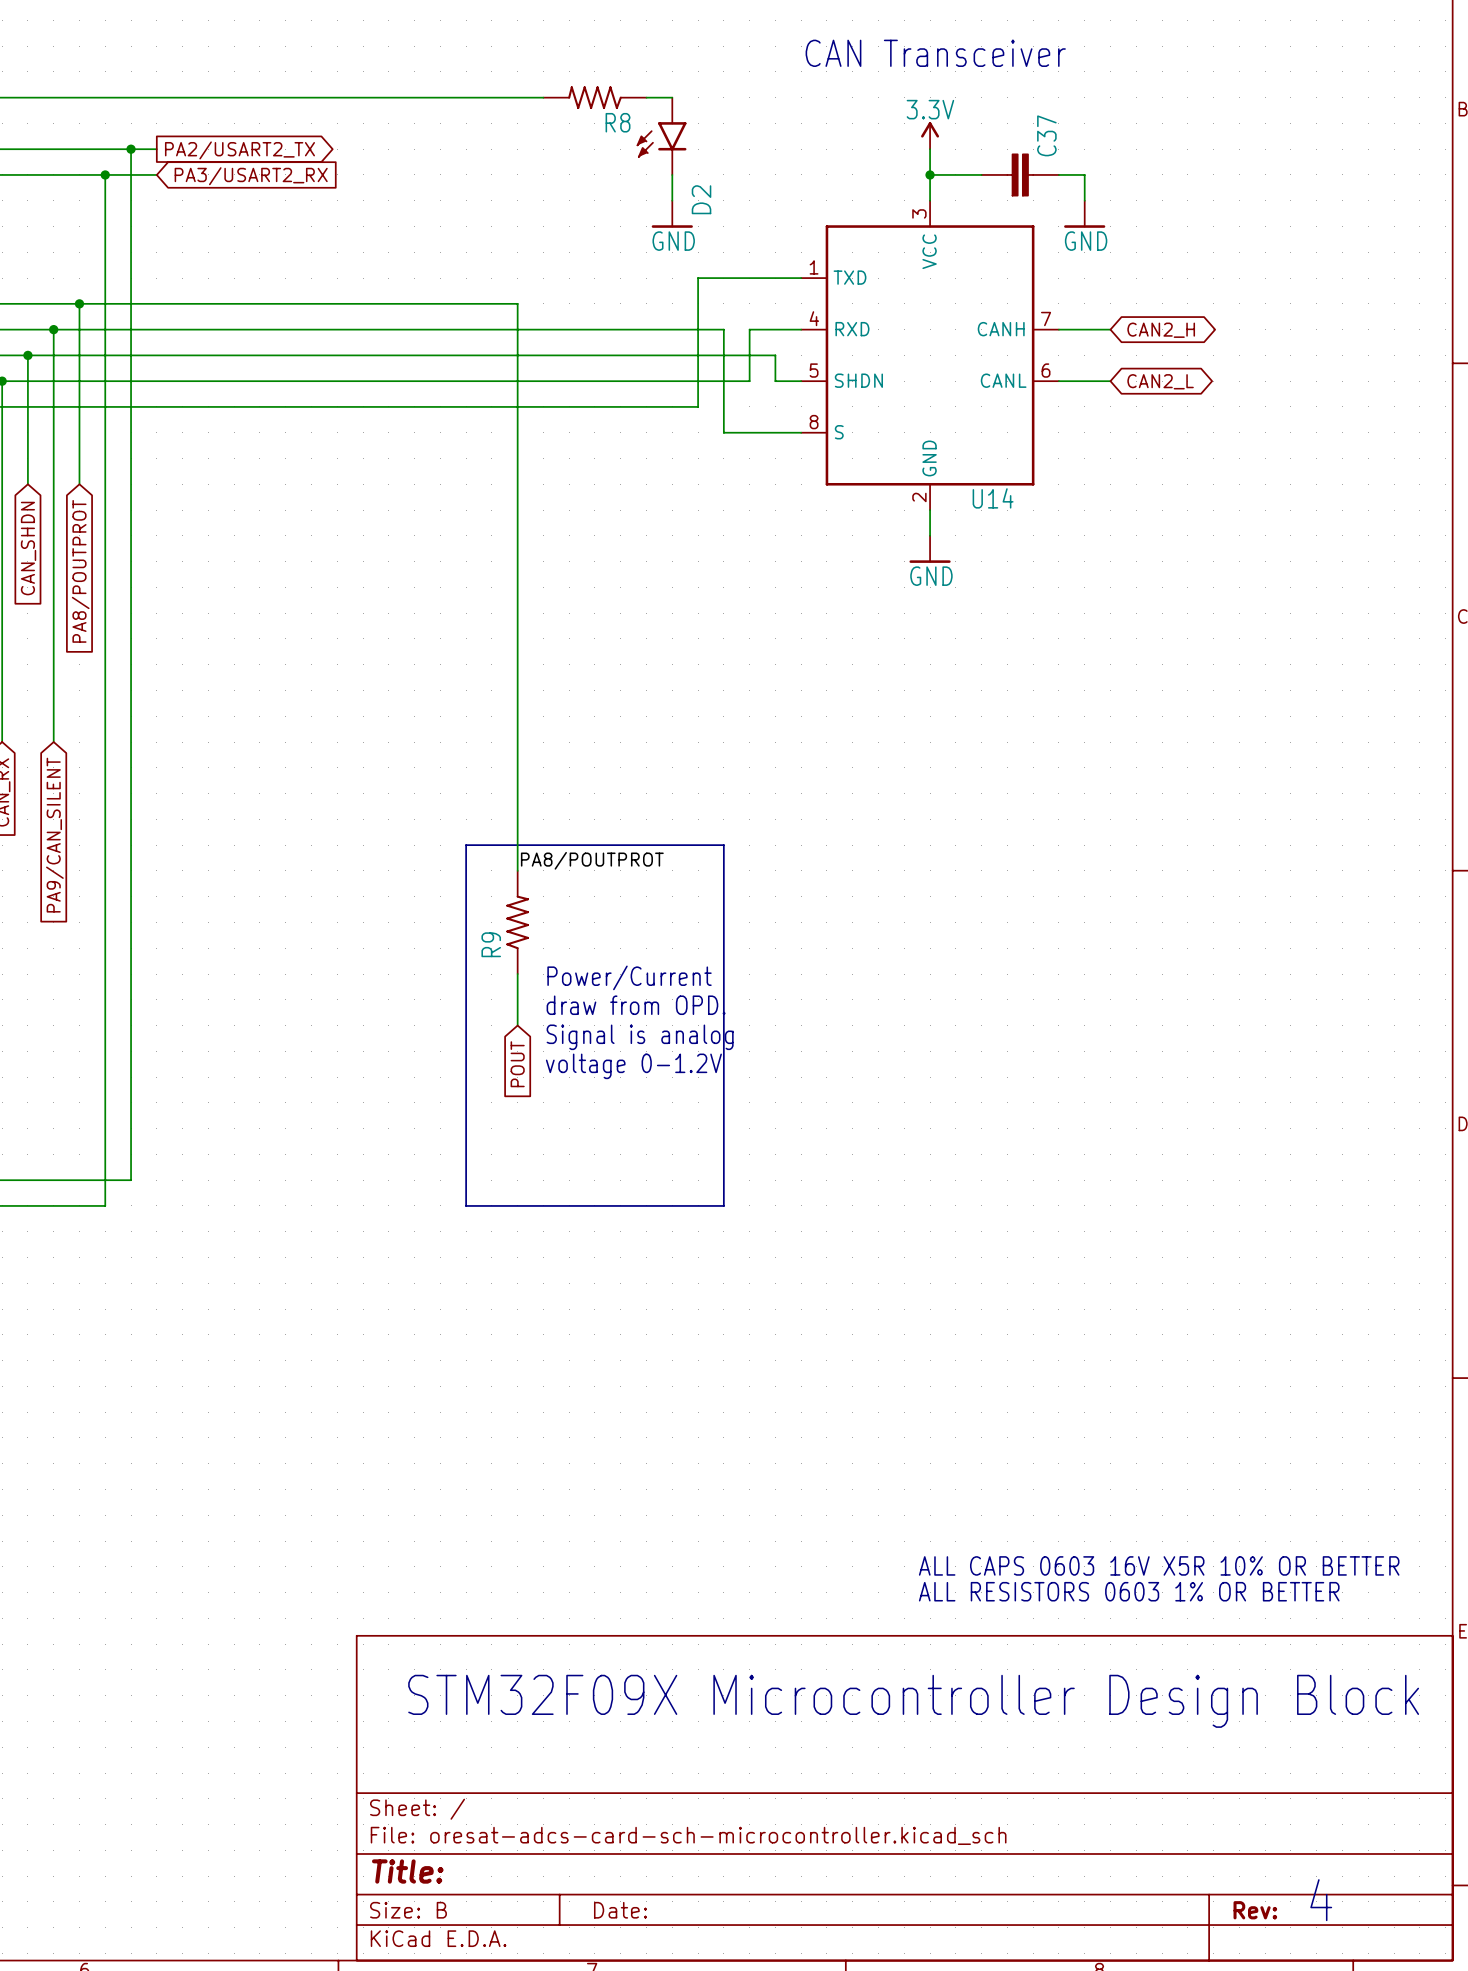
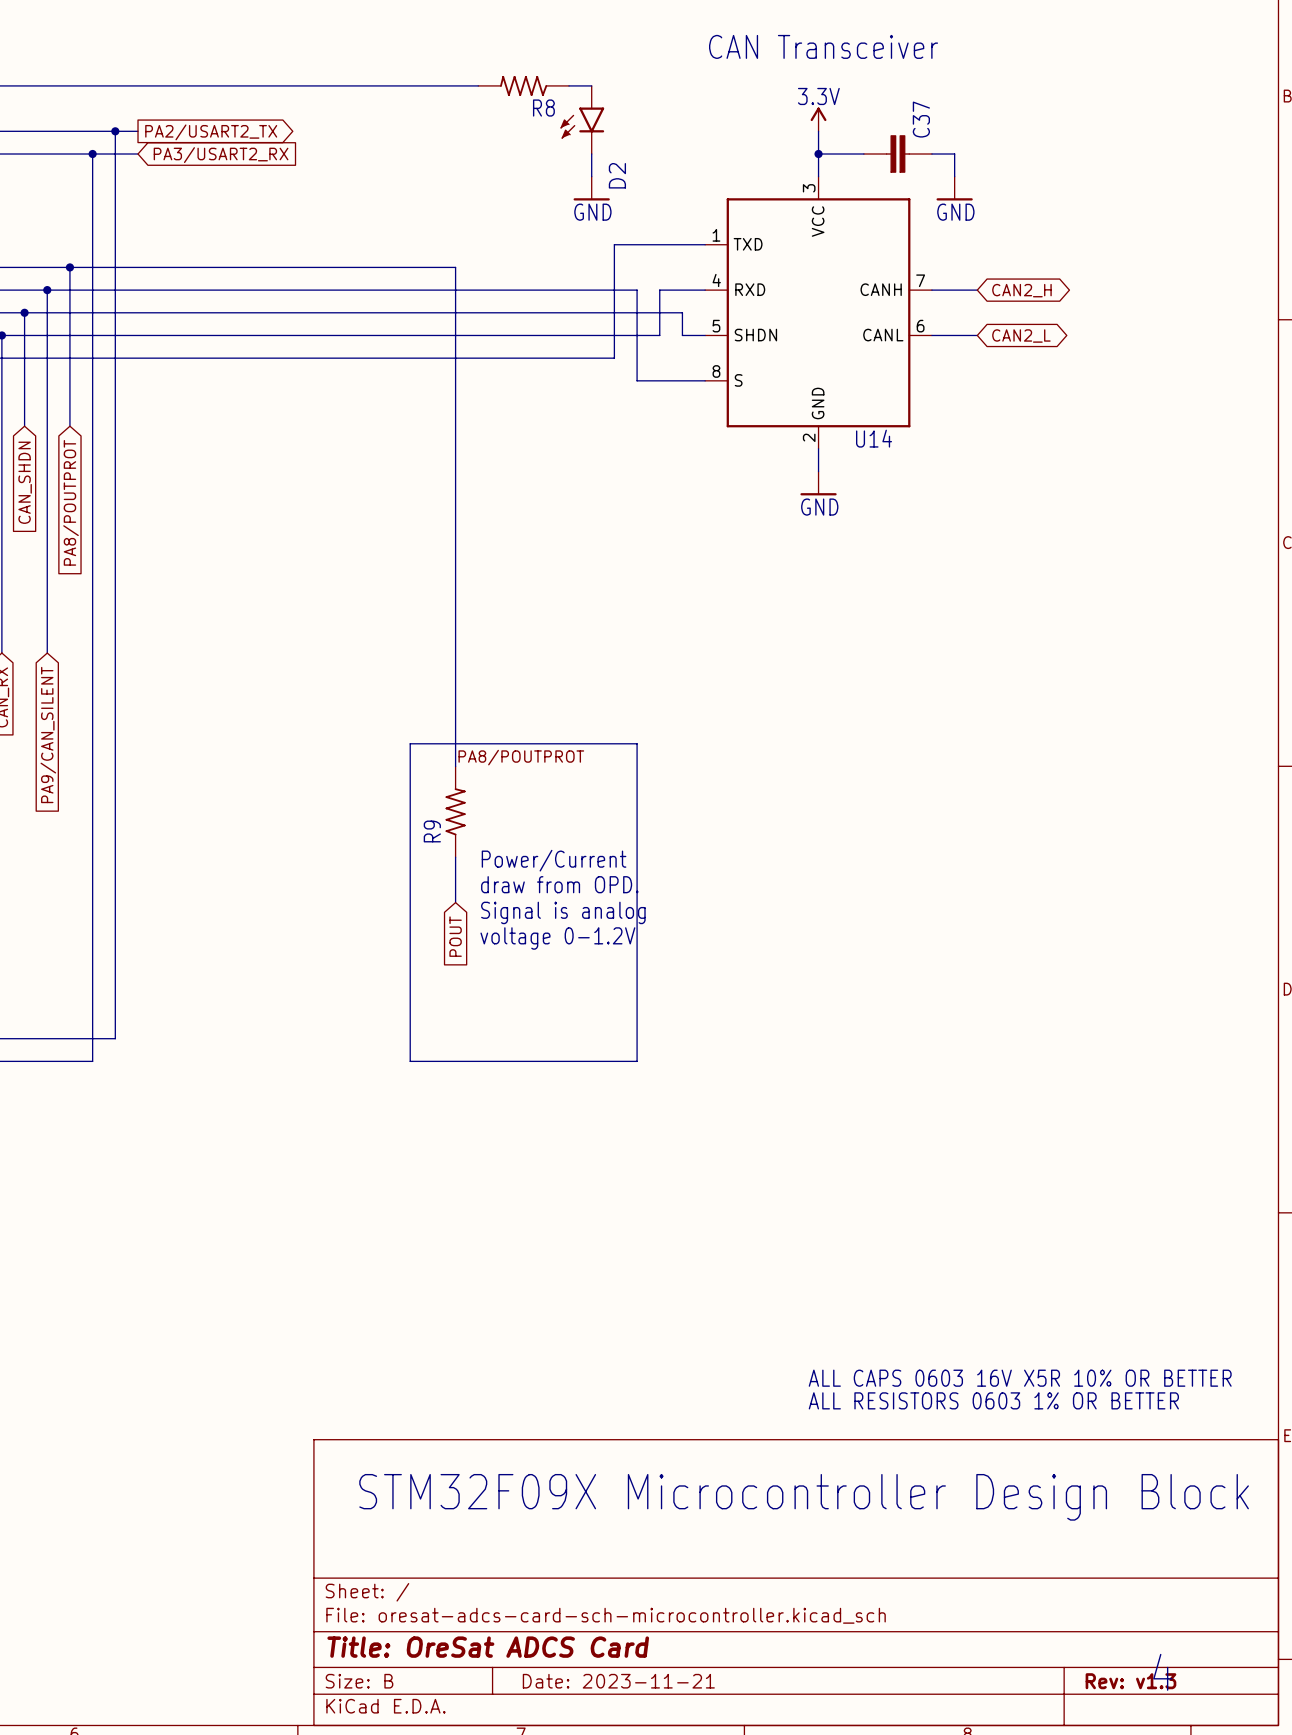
title block: Title: (407, 1871) -> Title: OreSat ADCS Card (488, 1647)
title block: Date: (620, 1910) -> Date: 2023-11-21 (618, 1681)
title block: Rev: (1255, 1910) -> Rev: v1.3 (1130, 1681)

